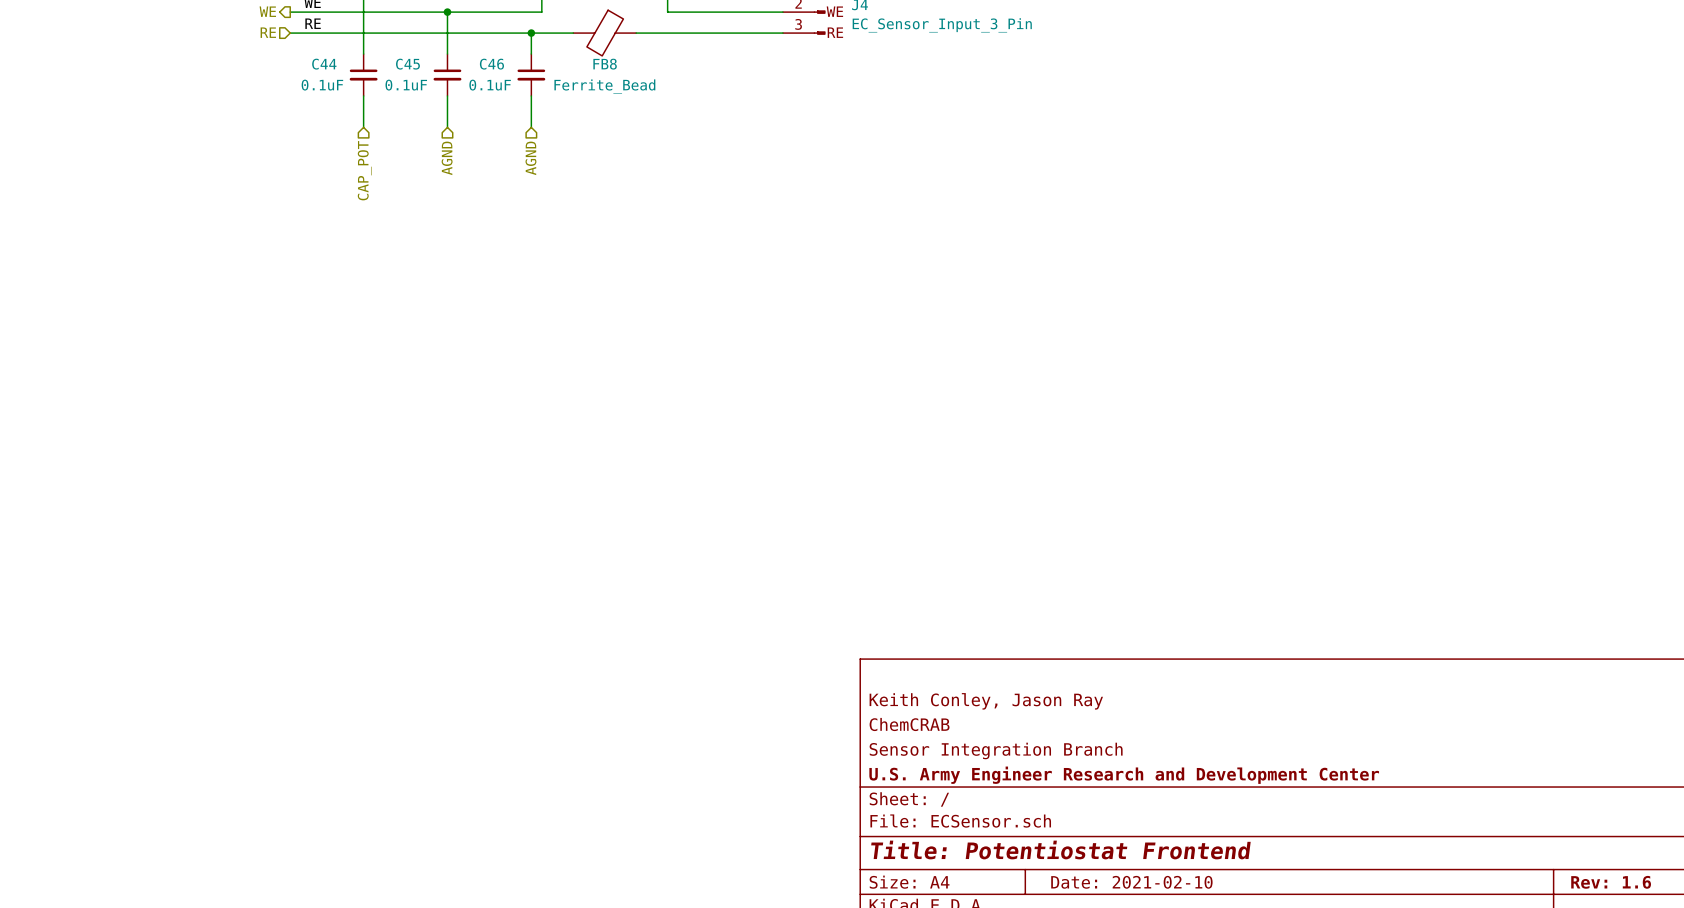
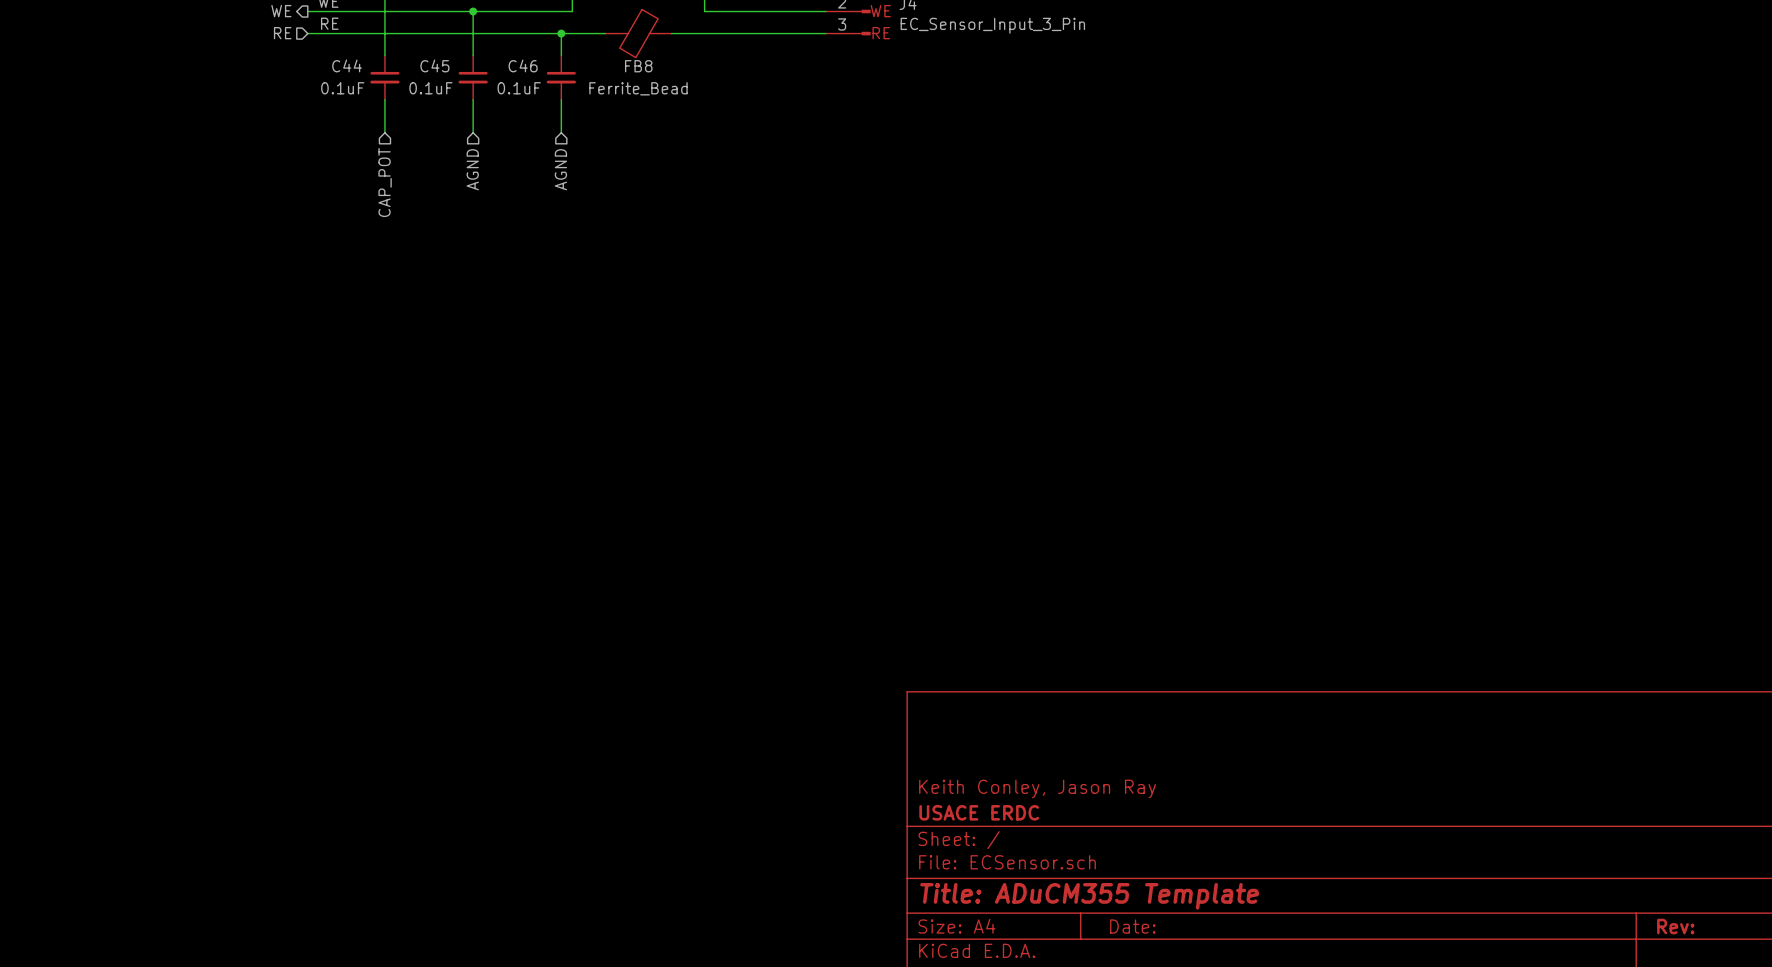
title block: Keith Conley, Jason Ray (986, 701) -> none
title block: ChemCRAB (909, 724) -> none
title block: Sensor Integration Branch (996, 750) -> Keith Conley, Jason Ray (1037, 788)
title block: U.S. Army Engineer Research and Development Center (1124, 775) -> USACE ERDC (979, 812)
title block: Title: Potentiostat Frontend (1060, 849) -> Title: ADuCM355 Template (1089, 896)
title block: Date: 2021-02-10 (1131, 882) -> Date: (1132, 926)
title block: Rev: 1.6 (1611, 882) -> Rev: (1675, 926)

